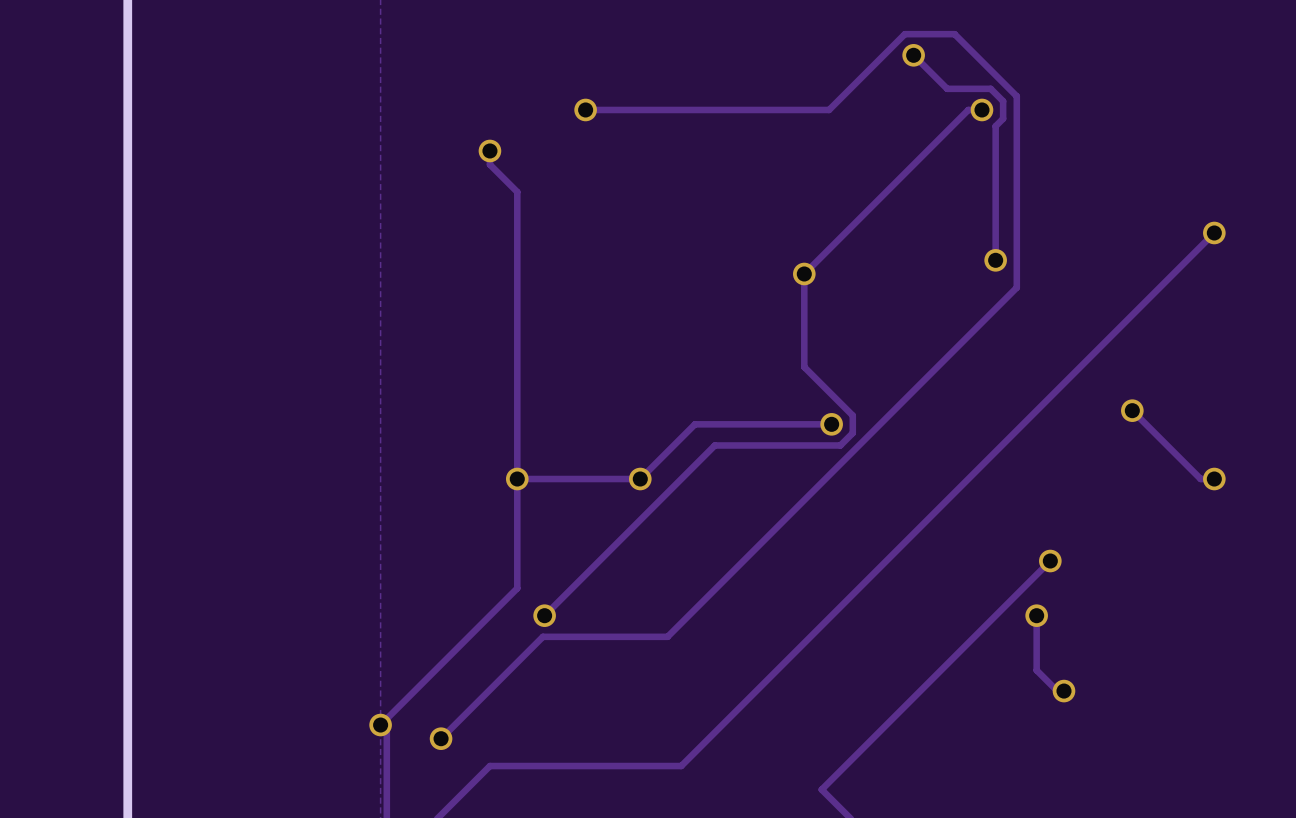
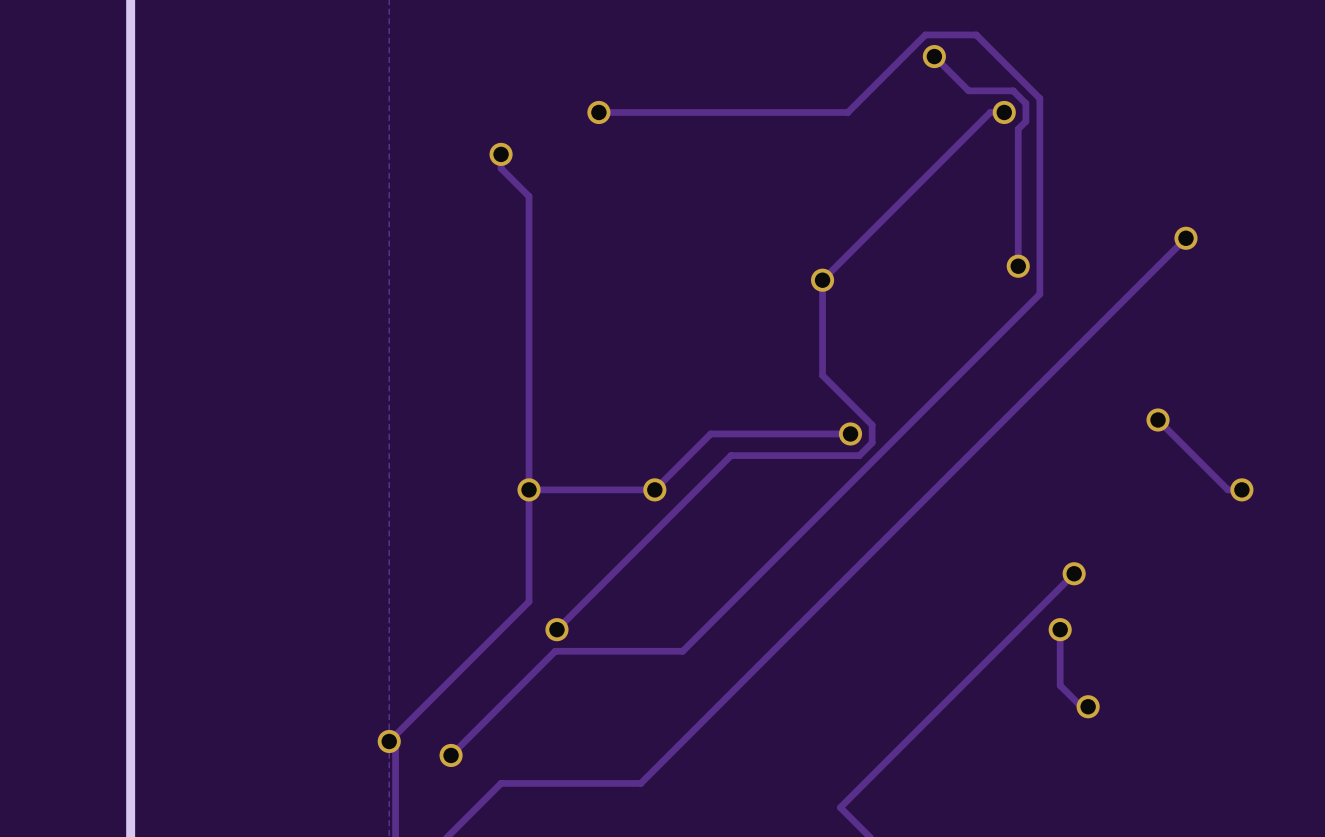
track: (1214, 232) (681, 766) (626, 766) -> (1185, 238) (640, 783)
via position: (1214, 232) -> (1185, 238)

